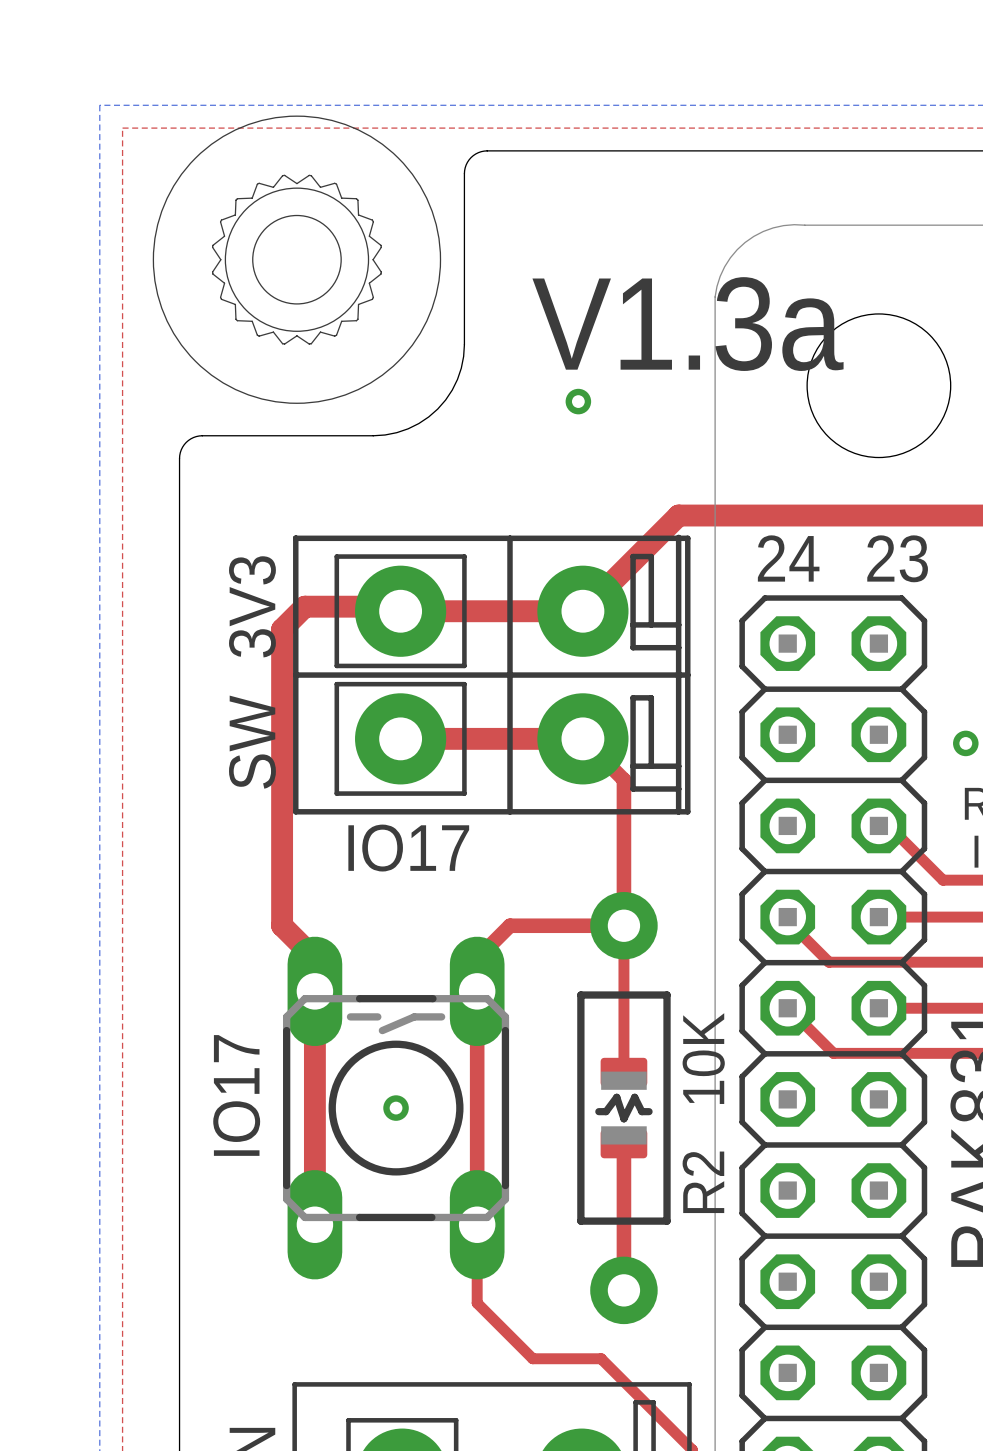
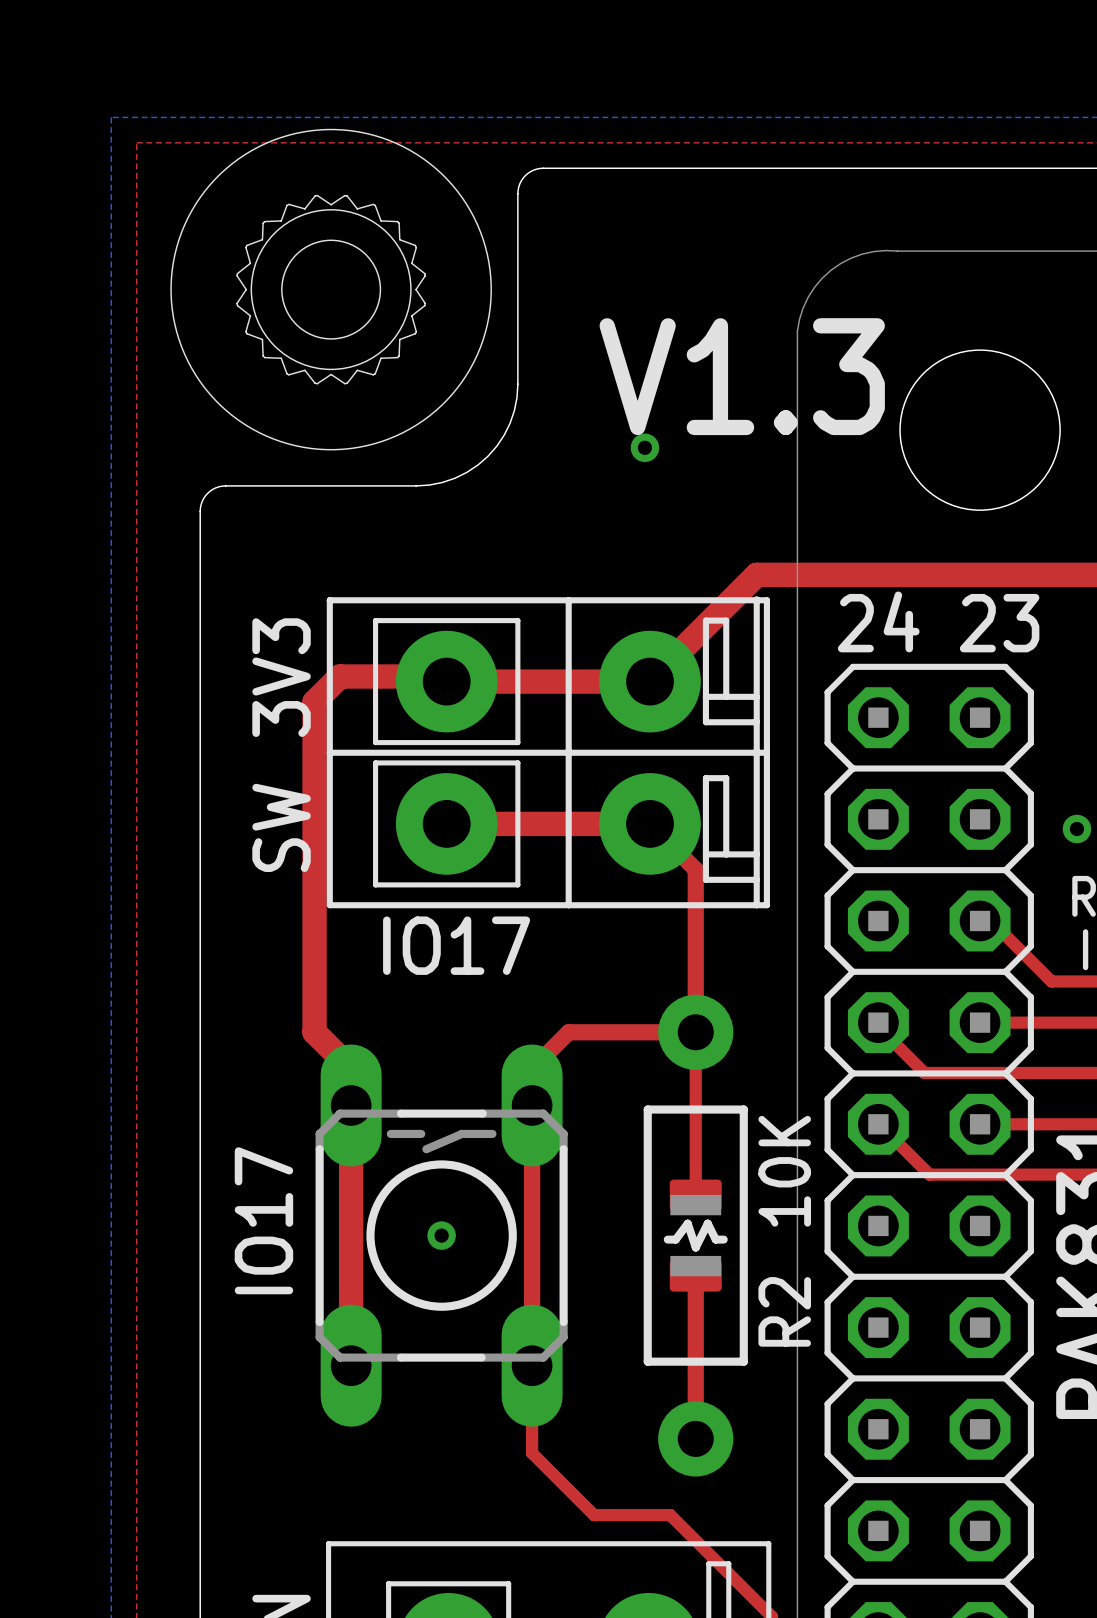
text: V1.3a (688, 324) -> V1.3 (742, 376)

